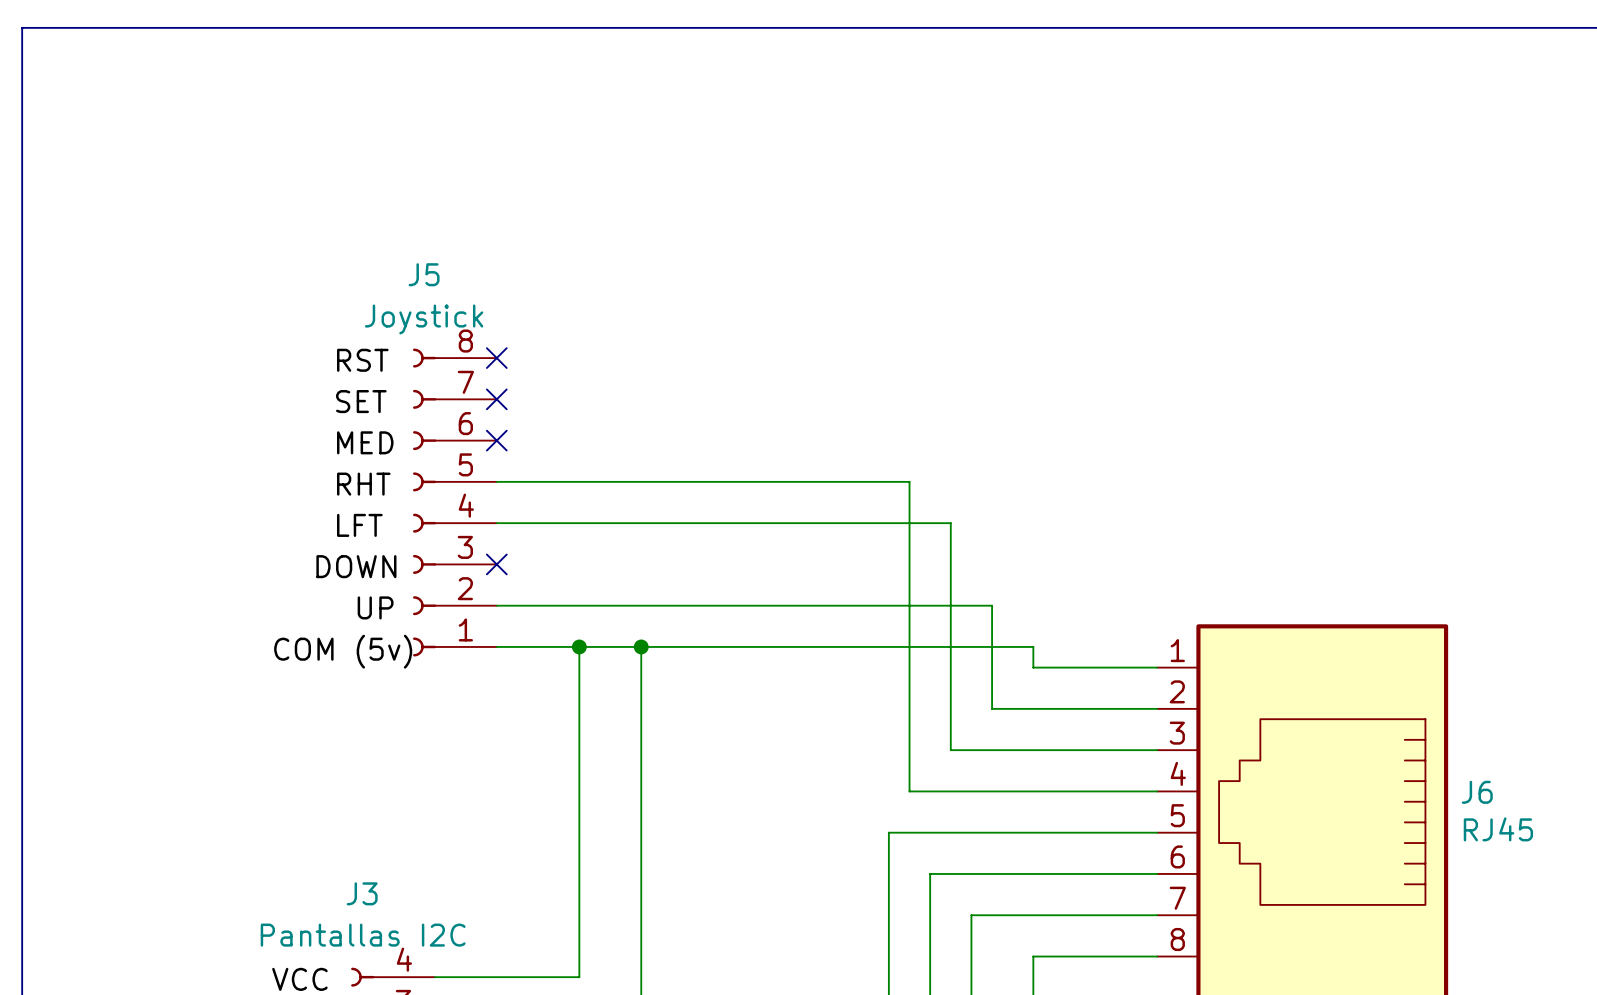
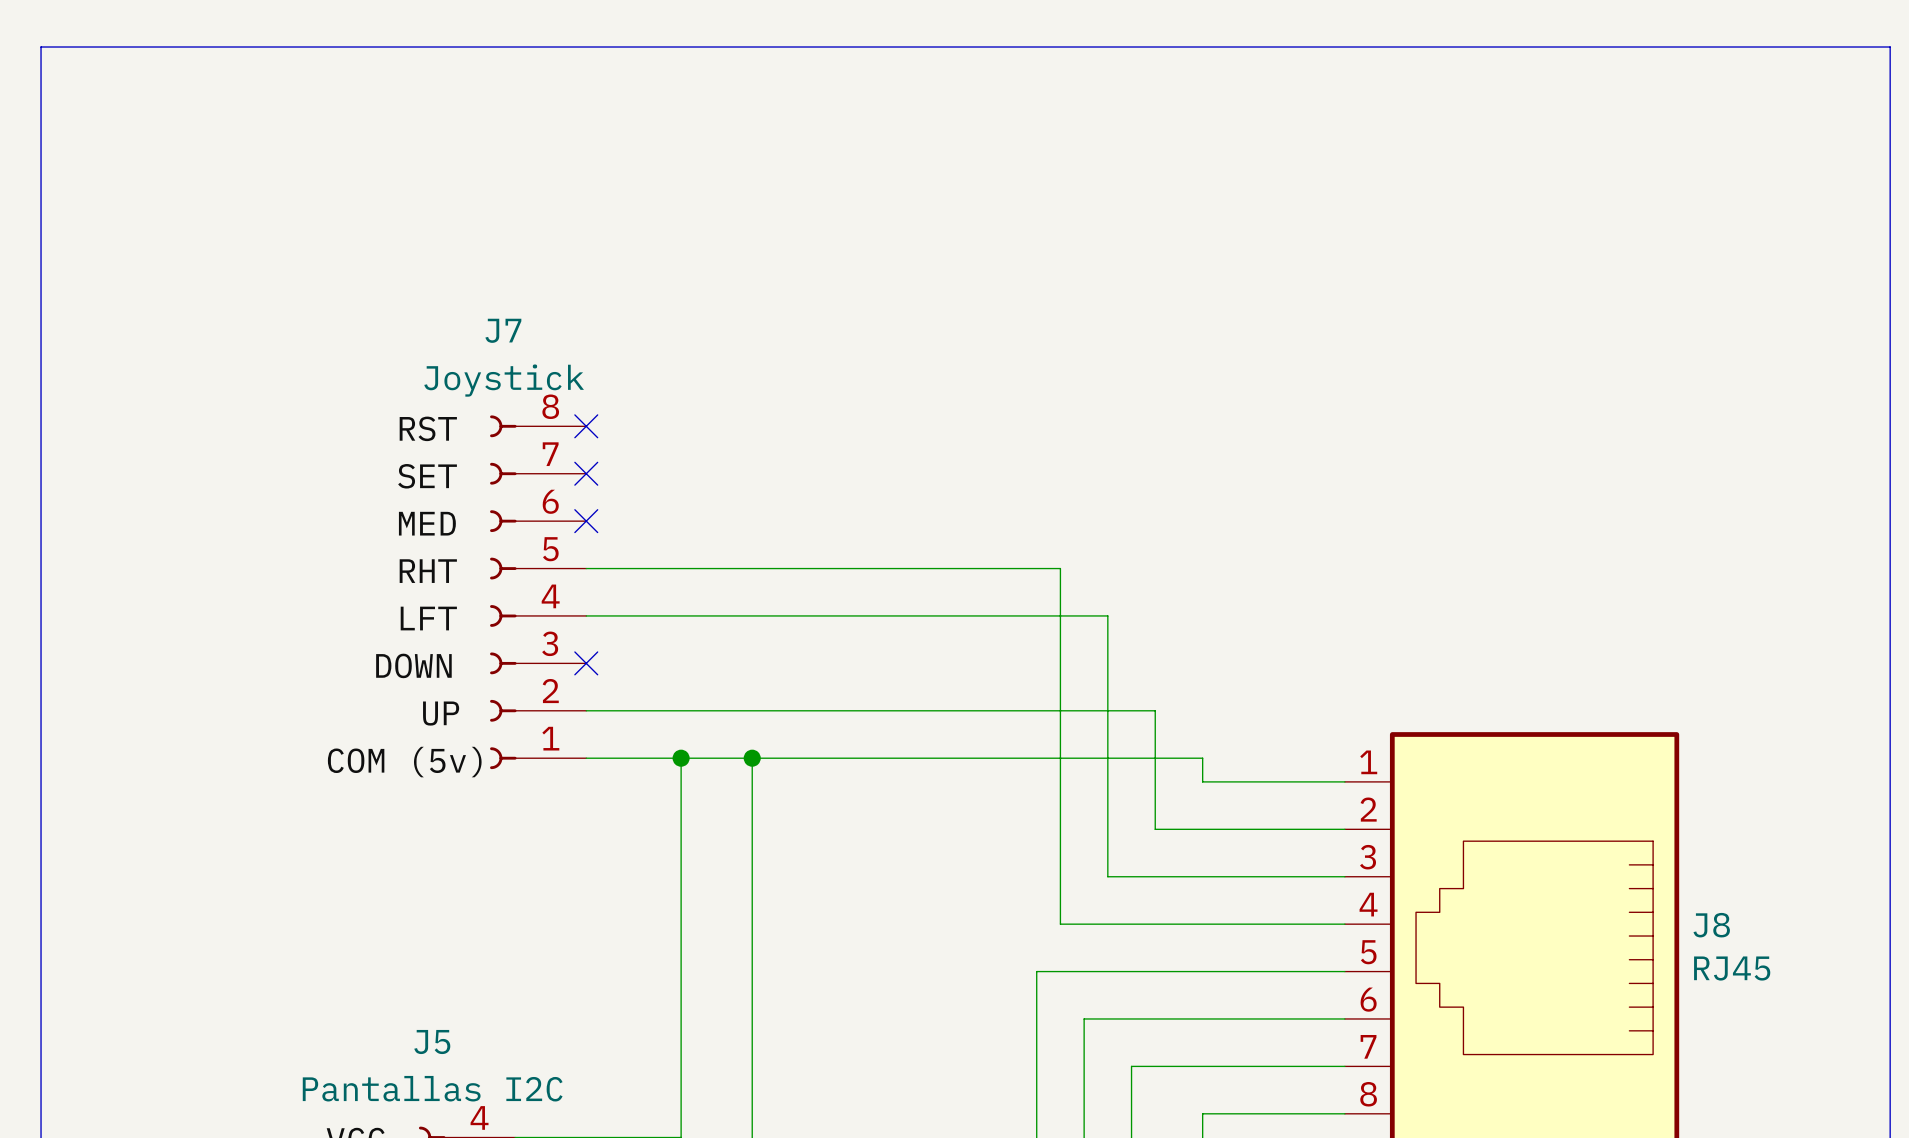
J5 name: J5 (424, 274) -> J7 (503, 330)
J6 name: J6 (1477, 792) -> J8 (1711, 925)
J3 name: J3 (362, 893) -> J5 (432, 1042)

